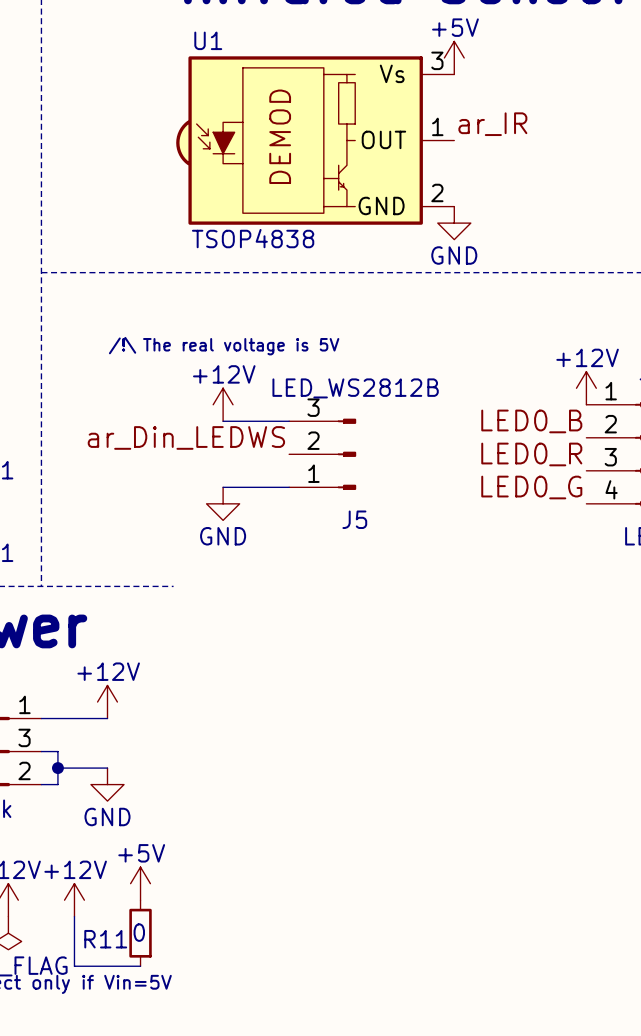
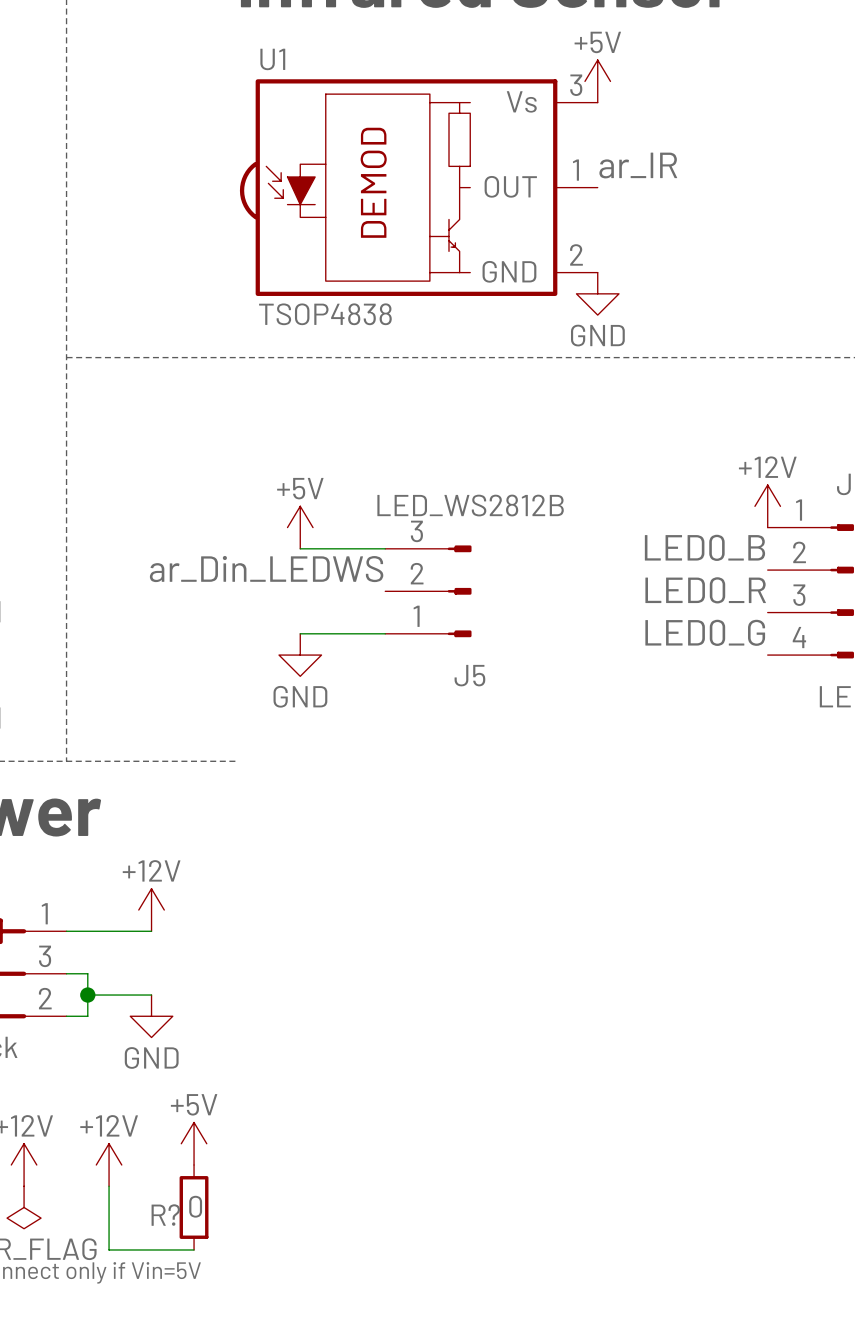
text: /!\ The real voltage is 5V (224, 346) -> none
power symbol: +12V (223, 404) -> +5V (300, 527)
R11 name: R11 (105, 939) -> R? (165, 1215)

